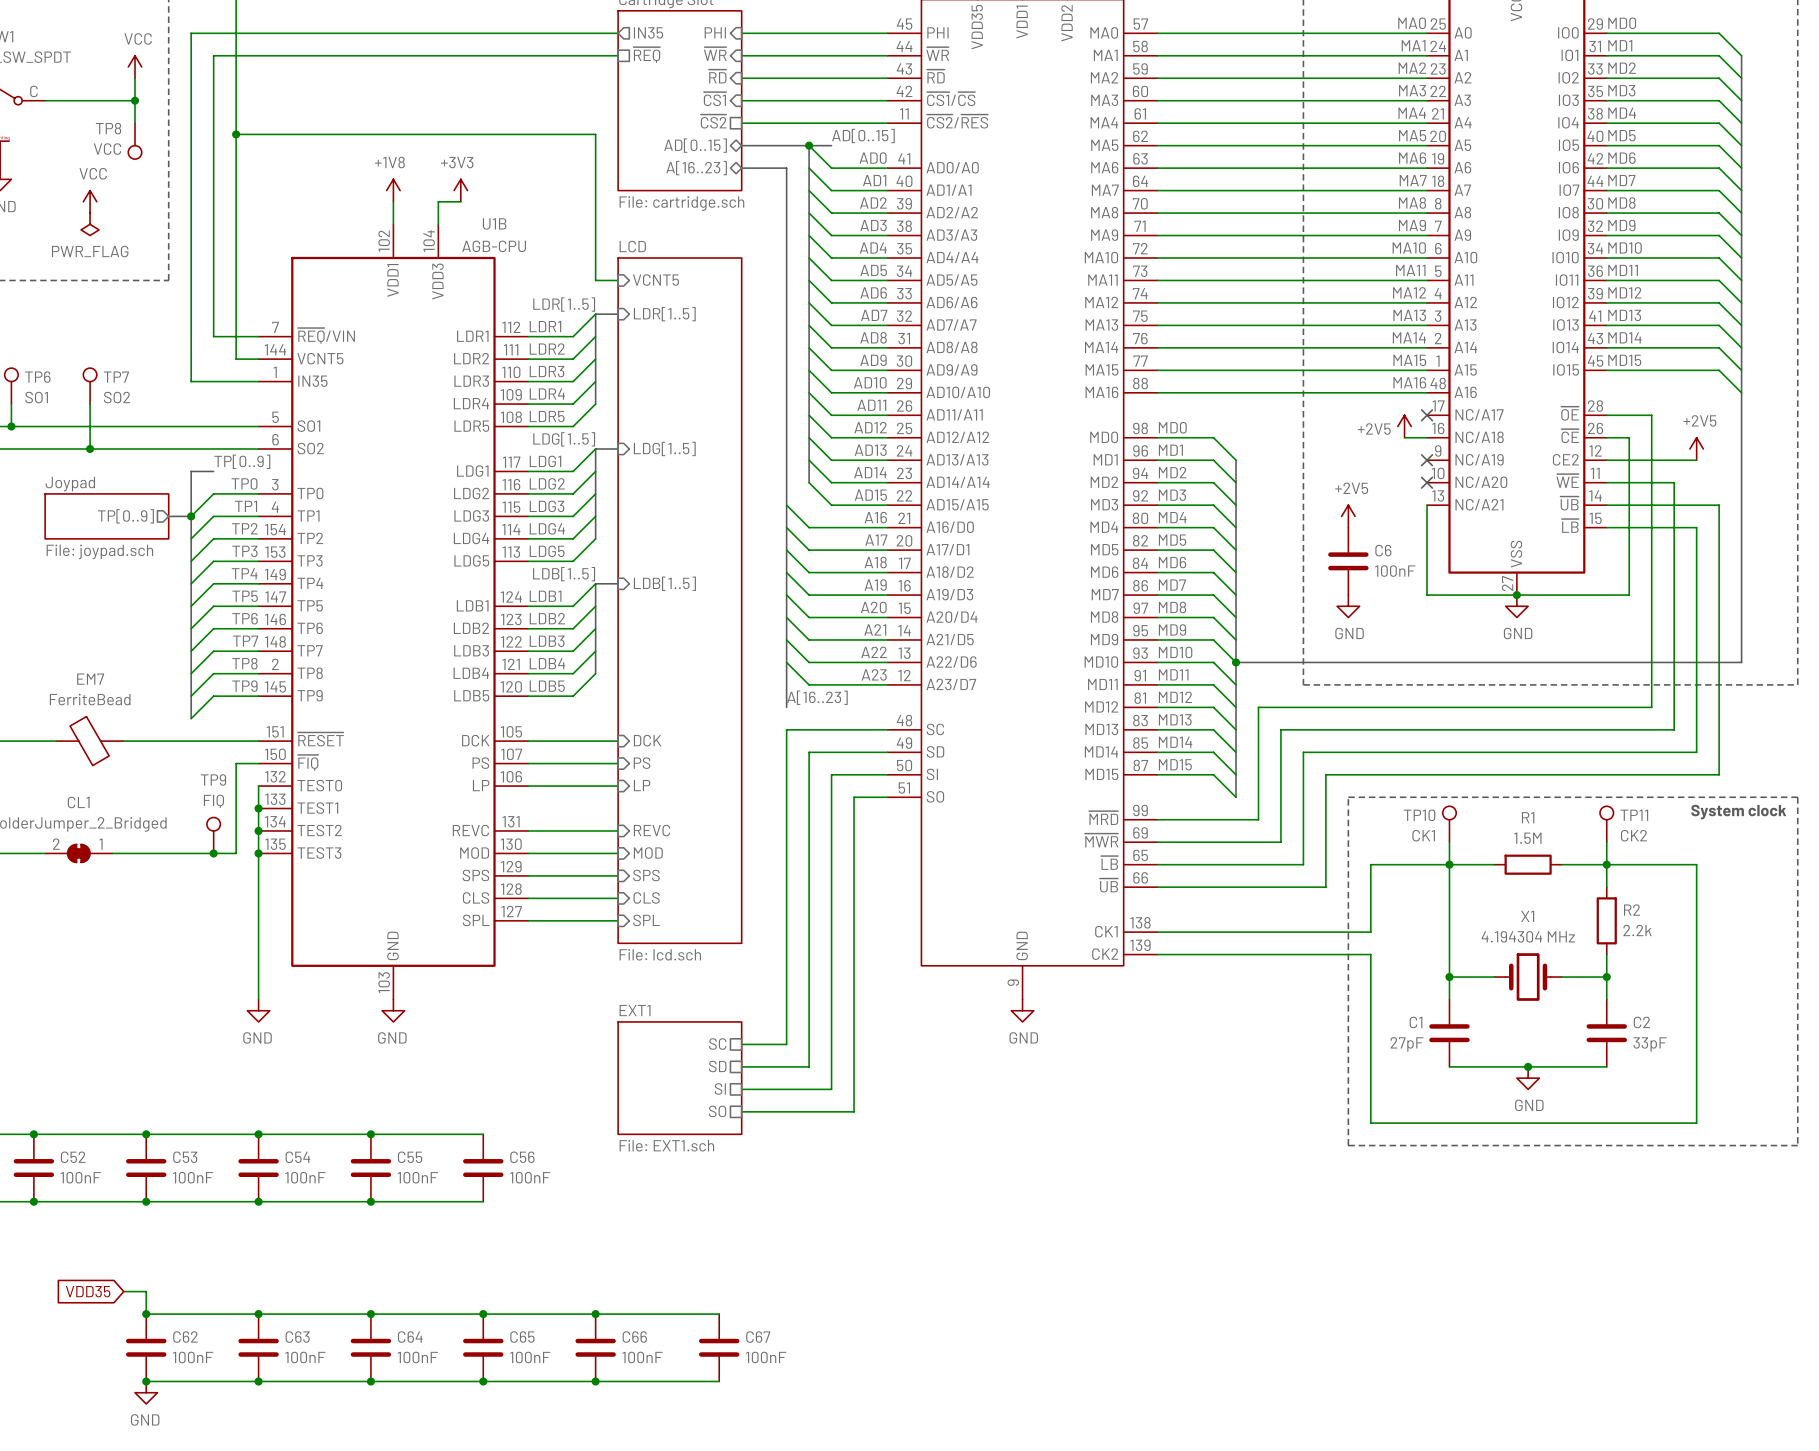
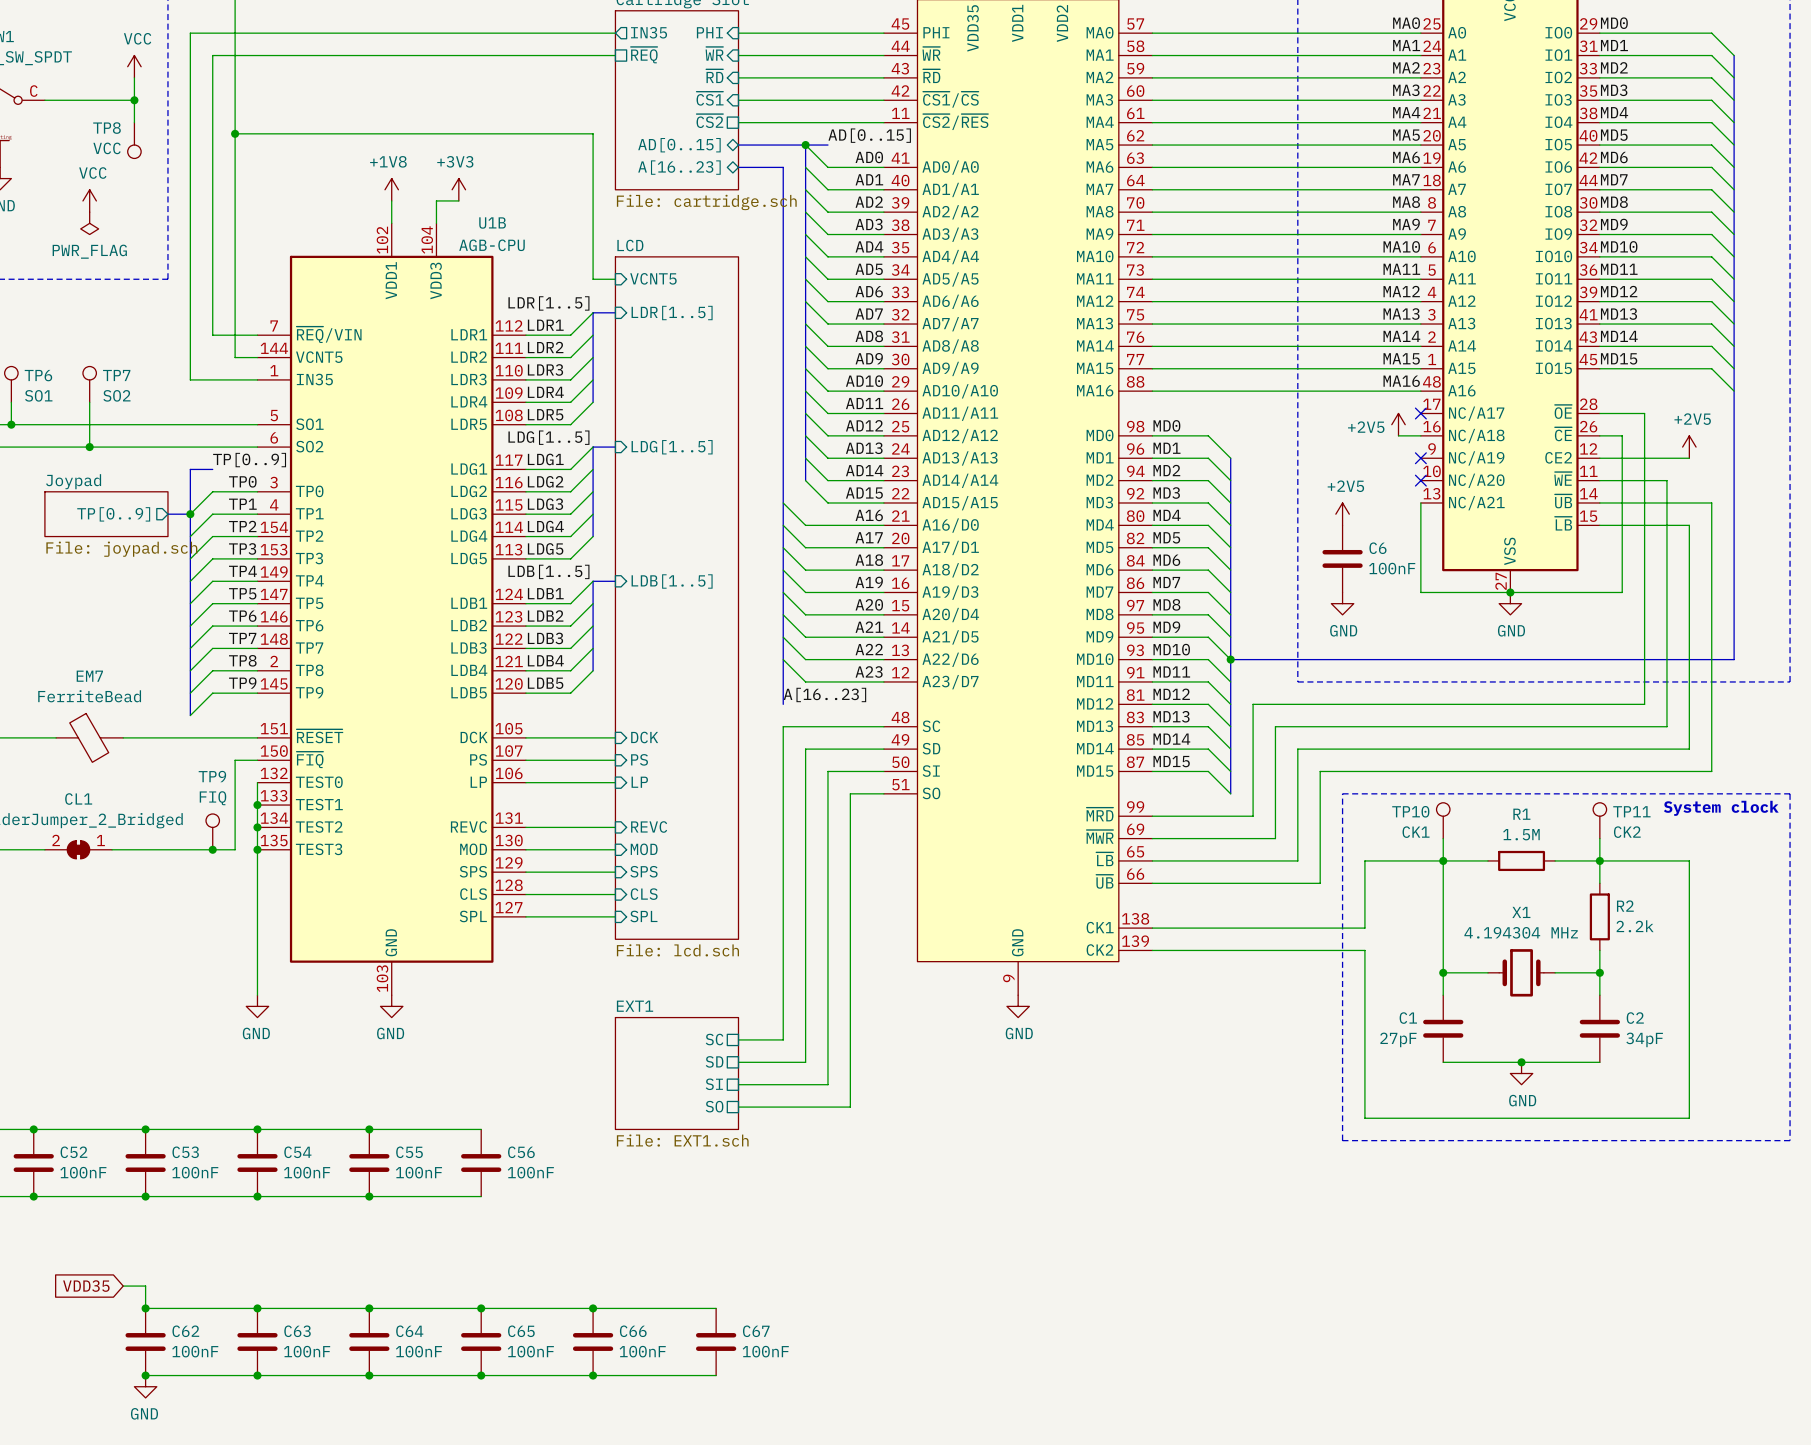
C2 value: 33pF (1650, 1044) -> 34pF (1644, 1039)

